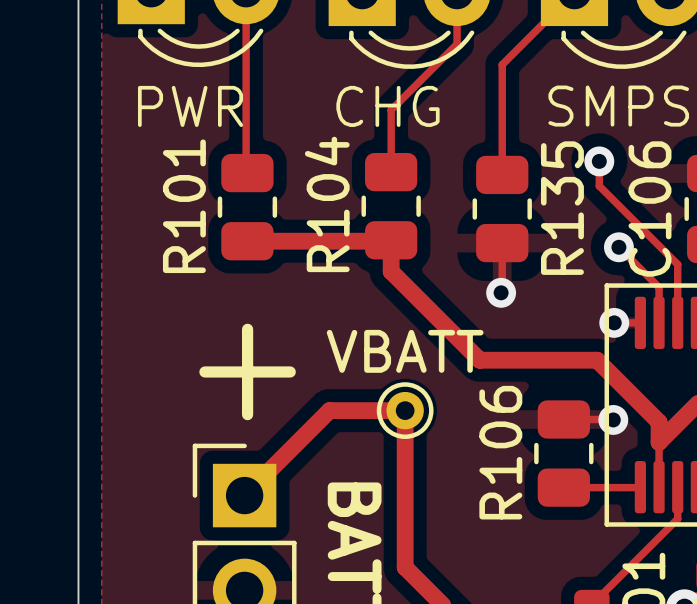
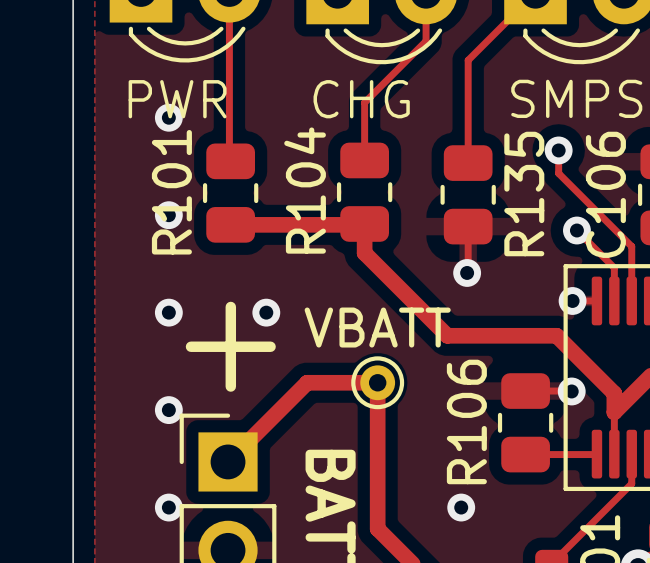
via: none -> (168, 117)
via: none -> (168, 215)
via: none -> (168, 312)
via: none -> (266, 312)
via: none -> (168, 410)
via: none -> (168, 507)
via: none -> (461, 507)

